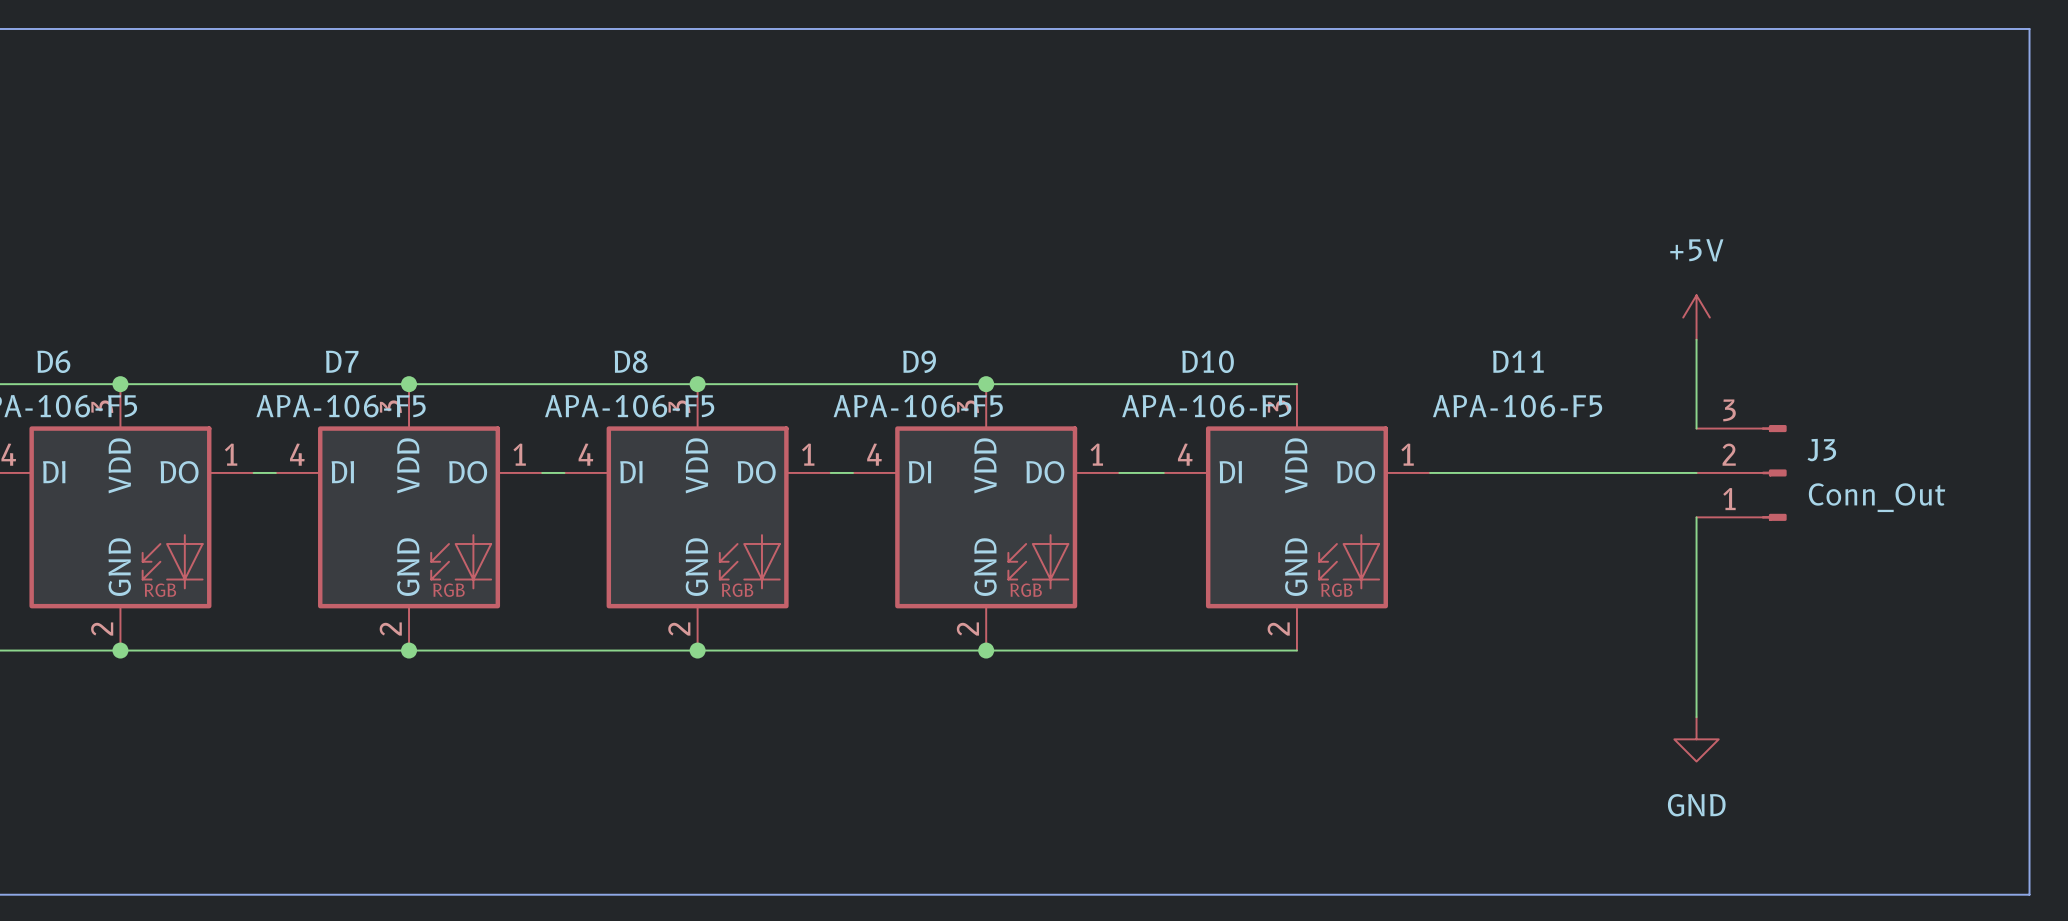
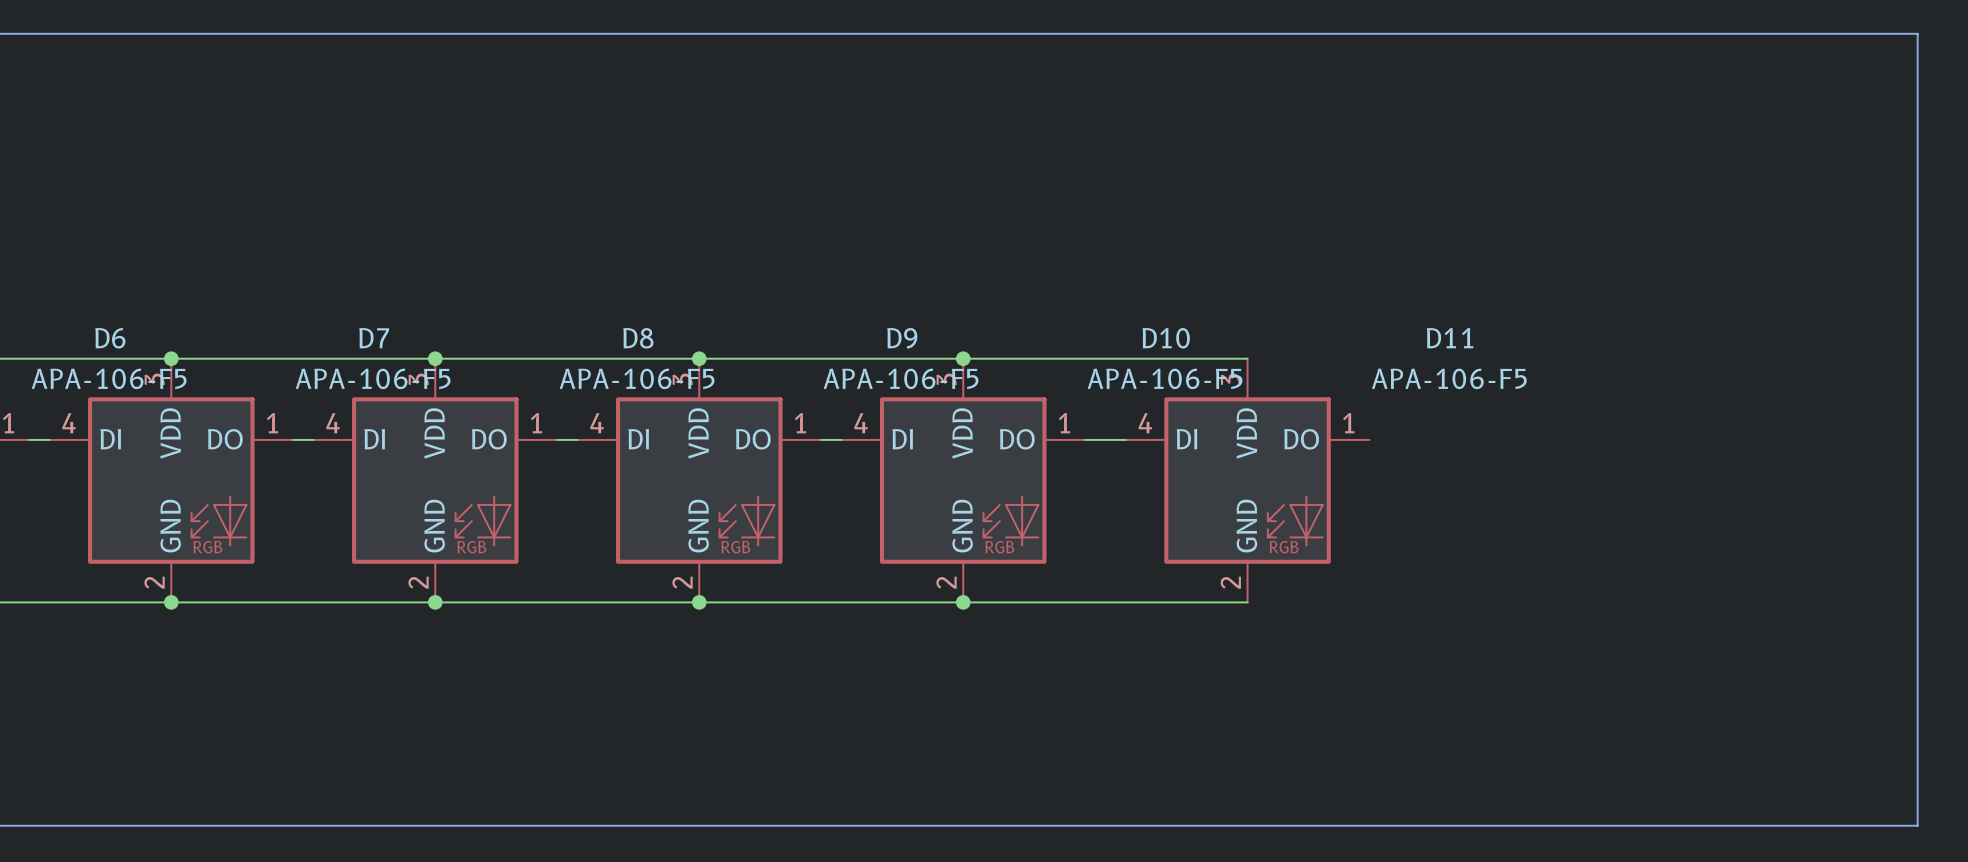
power symbol: +5V (1696, 317) -> none
wire: (1696, 339) (1696, 428) -> none
wire: (1430, 472) (1696, 472) -> none
J3: Conn_Out (1741, 472) -> none
wire: (1696, 517) (1696, 717) -> none
power symbol: GND (1696, 739) -> none

